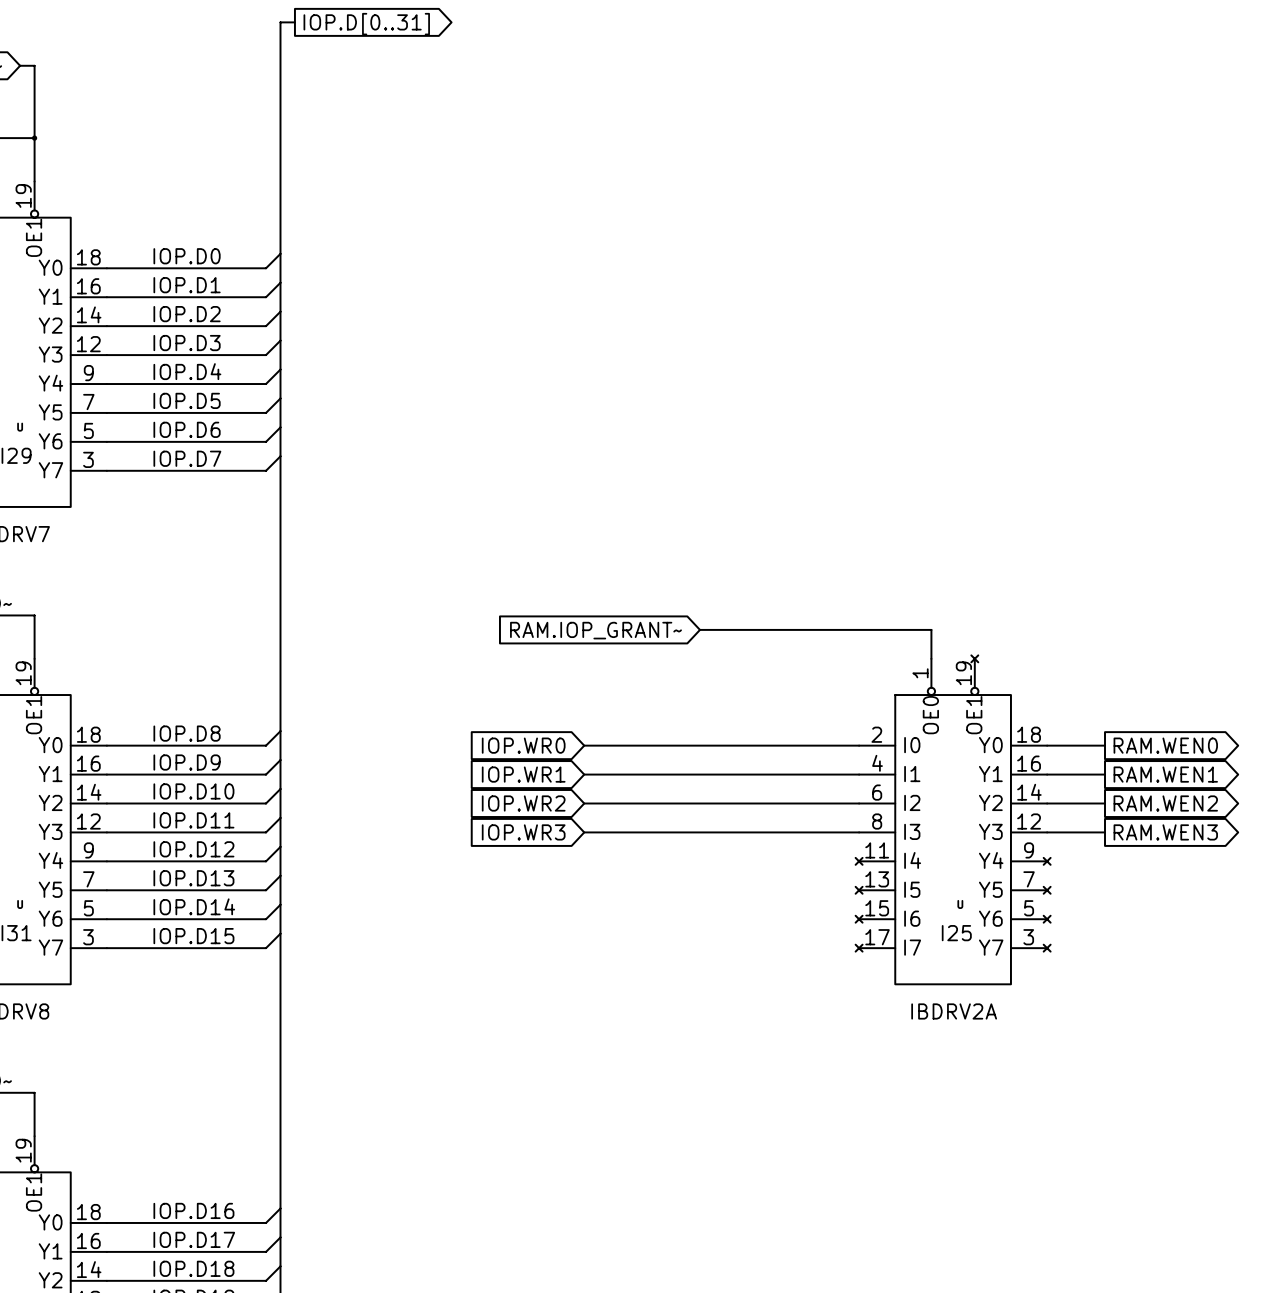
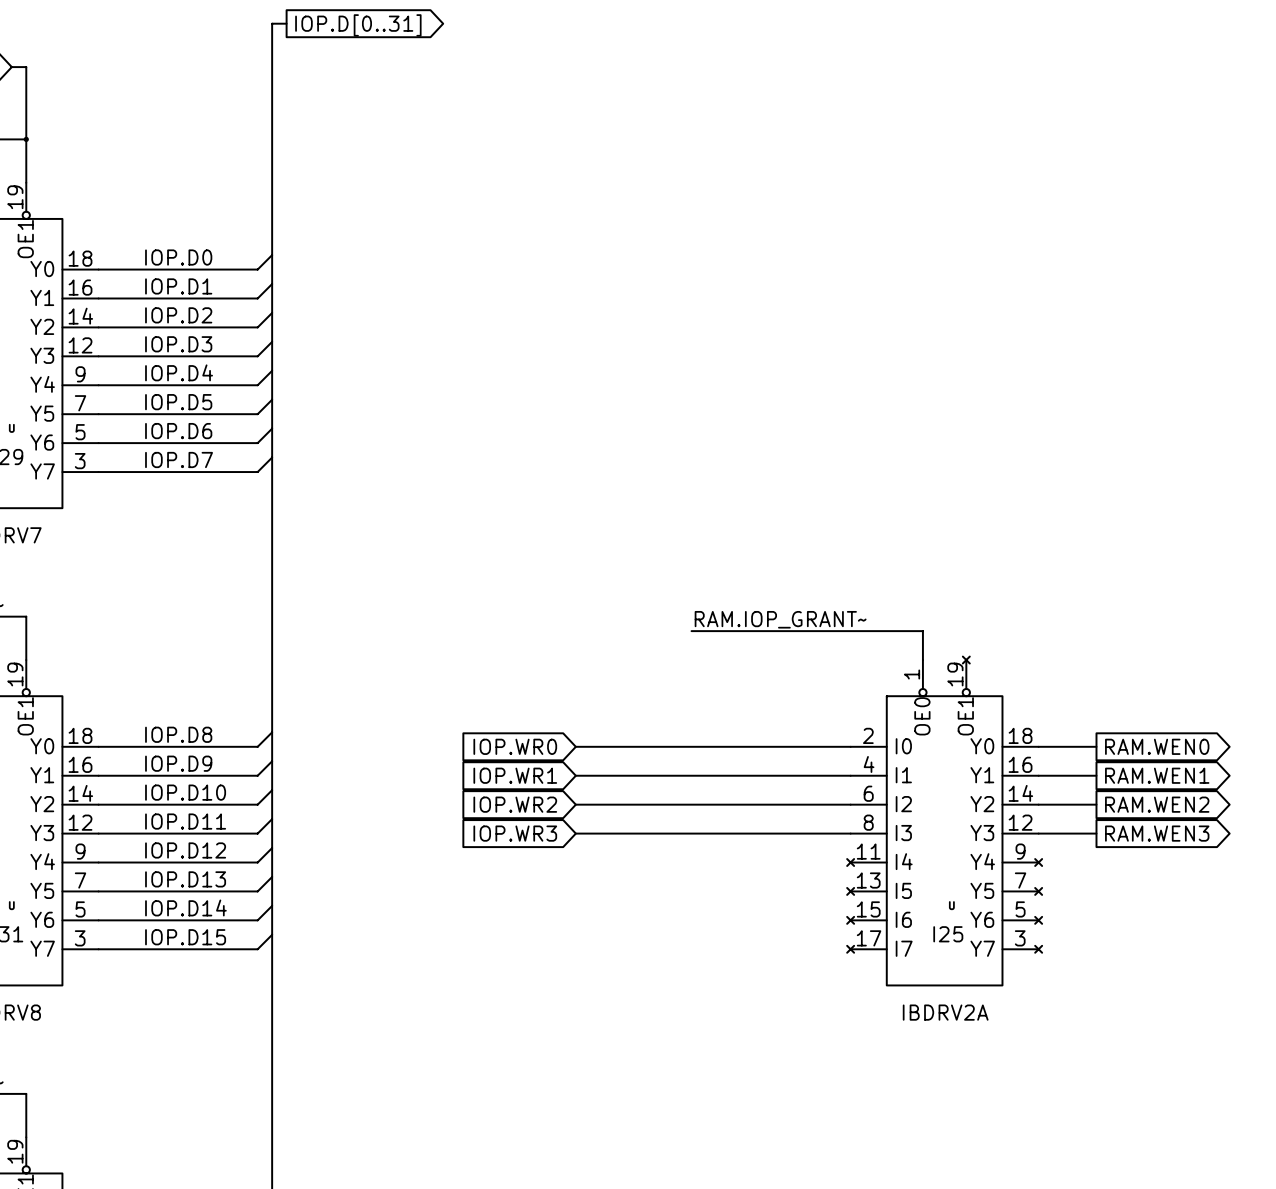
label: none -> RAM.IOP_GRANT~ (780, 619)
global label: RAM.IOP_GRANT~ (596, 630) -> none

